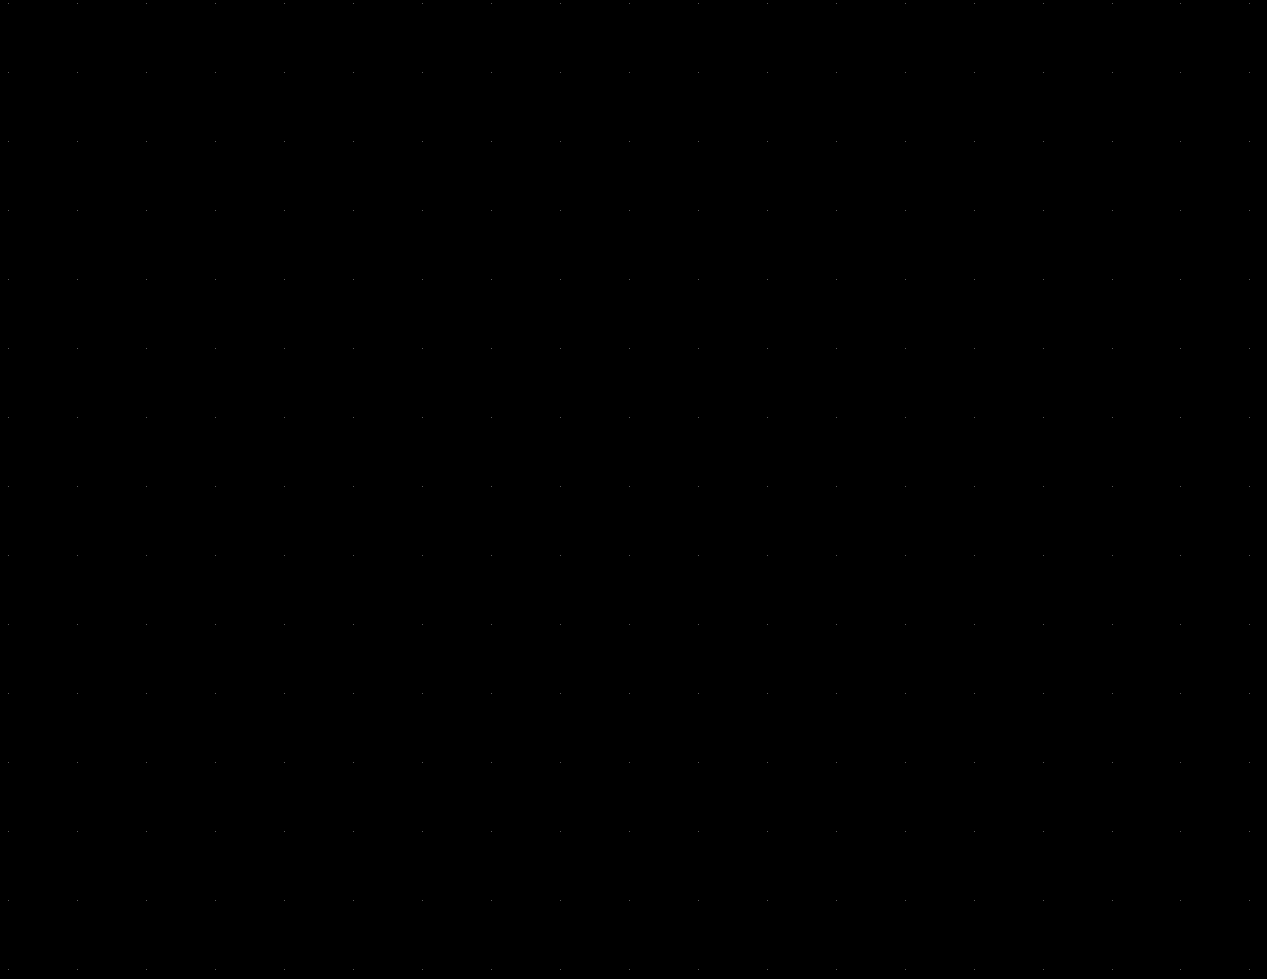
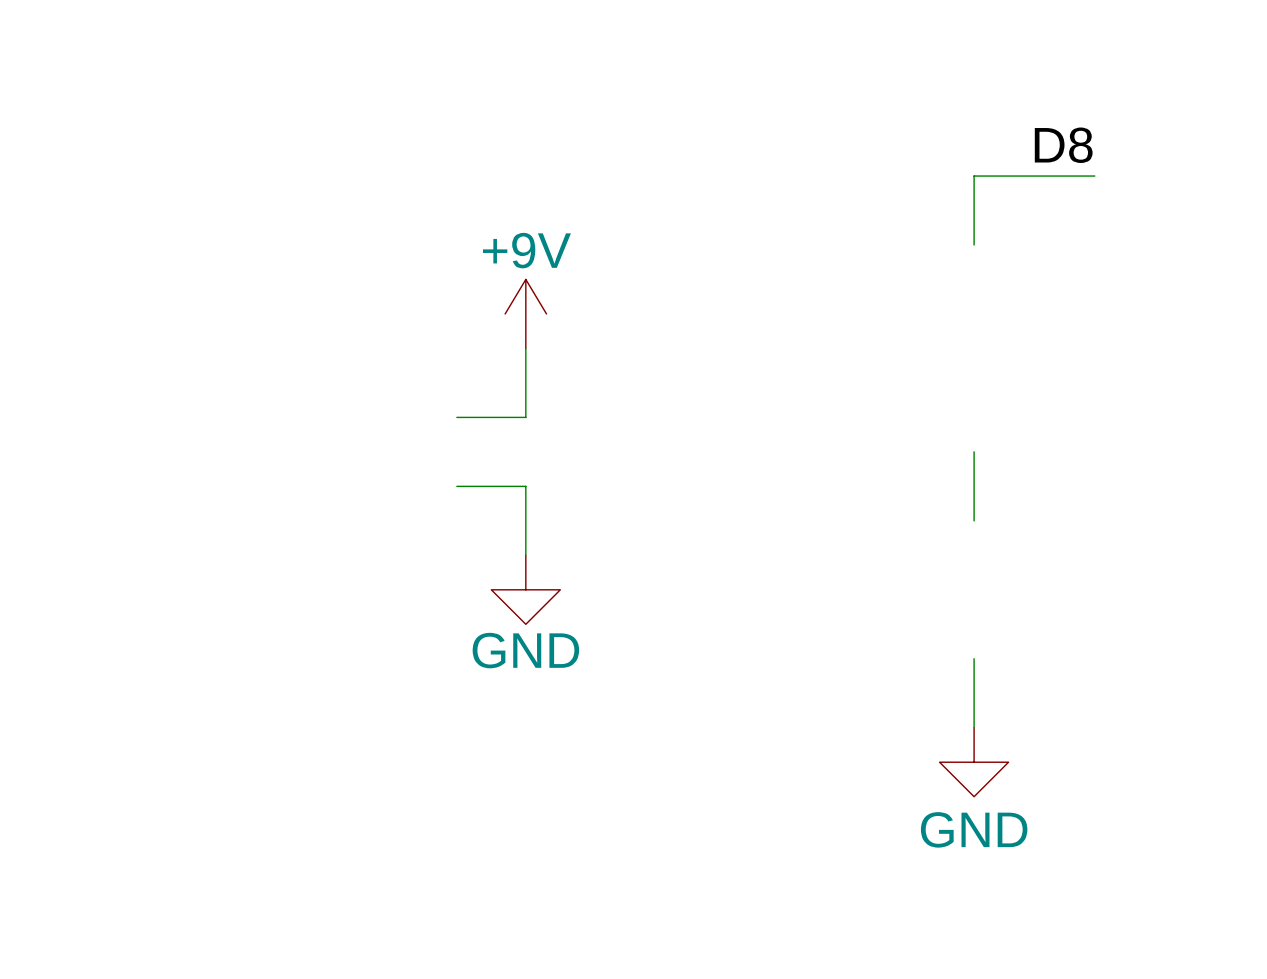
label: none -> D8 (1063, 145)
wire: none -> (1094, 176) (974, 176) (974, 245)
power symbol: none -> +9V (525, 313)
wire: none -> (525, 348) (525, 417) (456, 417)
wire: none -> (974, 451) (974, 520)
wire: none -> (456, 486) (525, 486) (525, 555)
power symbol: none -> GND (525, 589)
wire: none -> (974, 658) (974, 727)
power symbol: none -> GND (974, 762)

